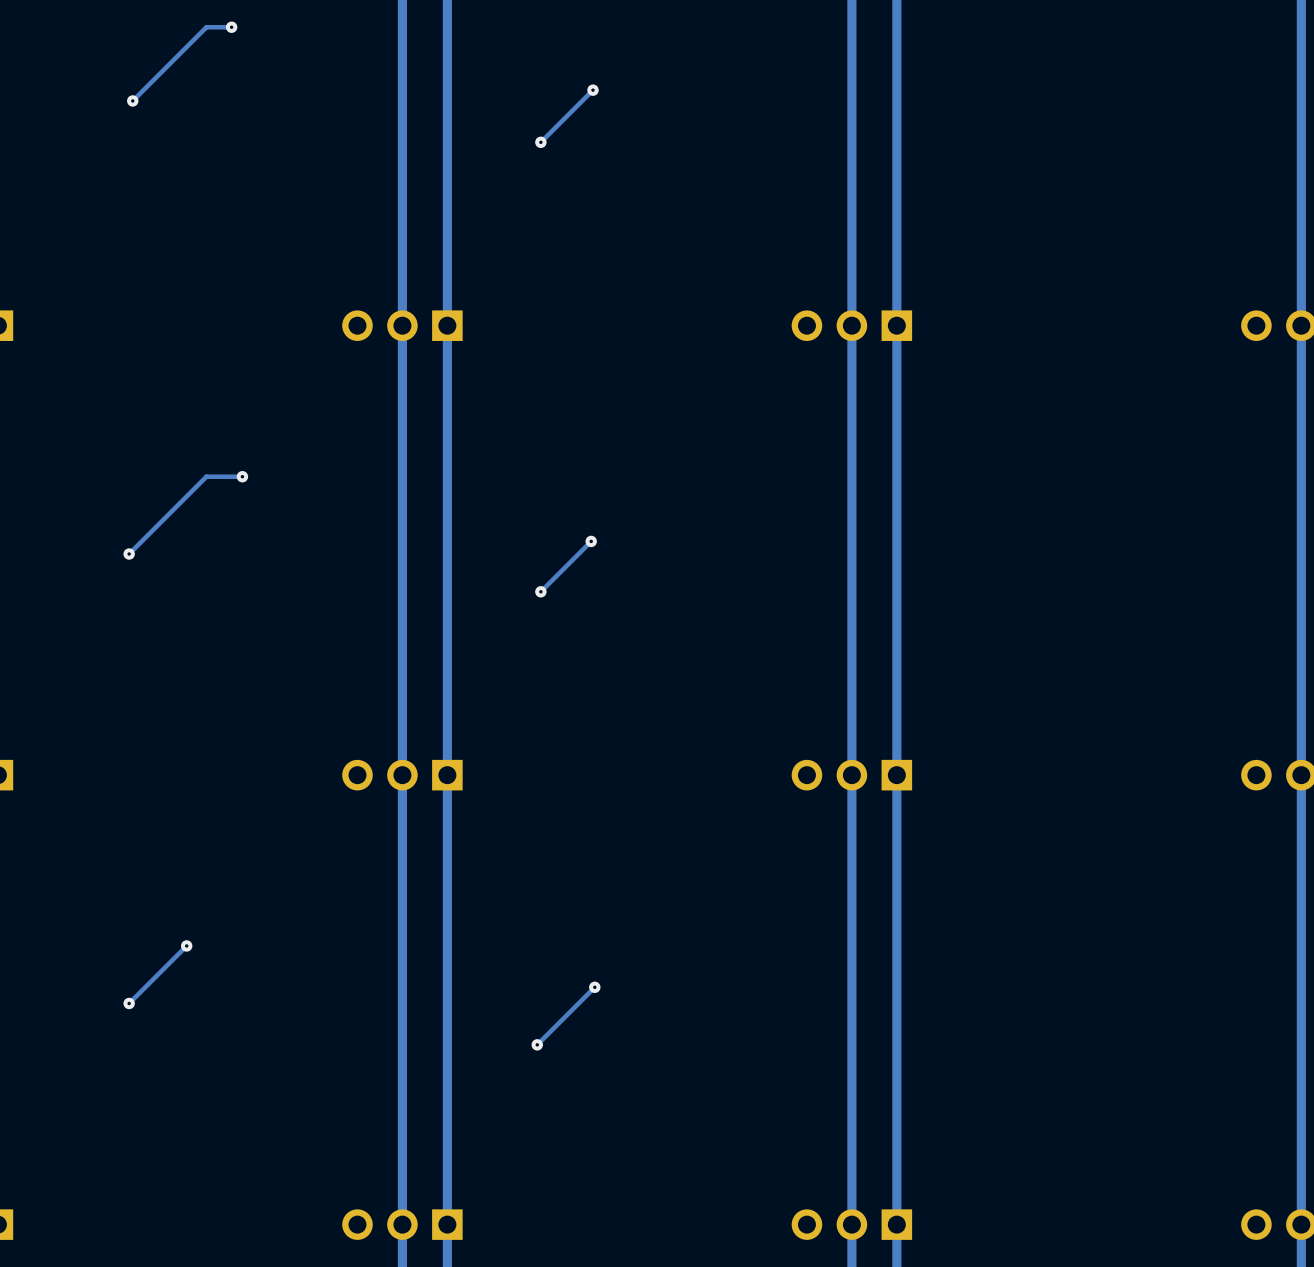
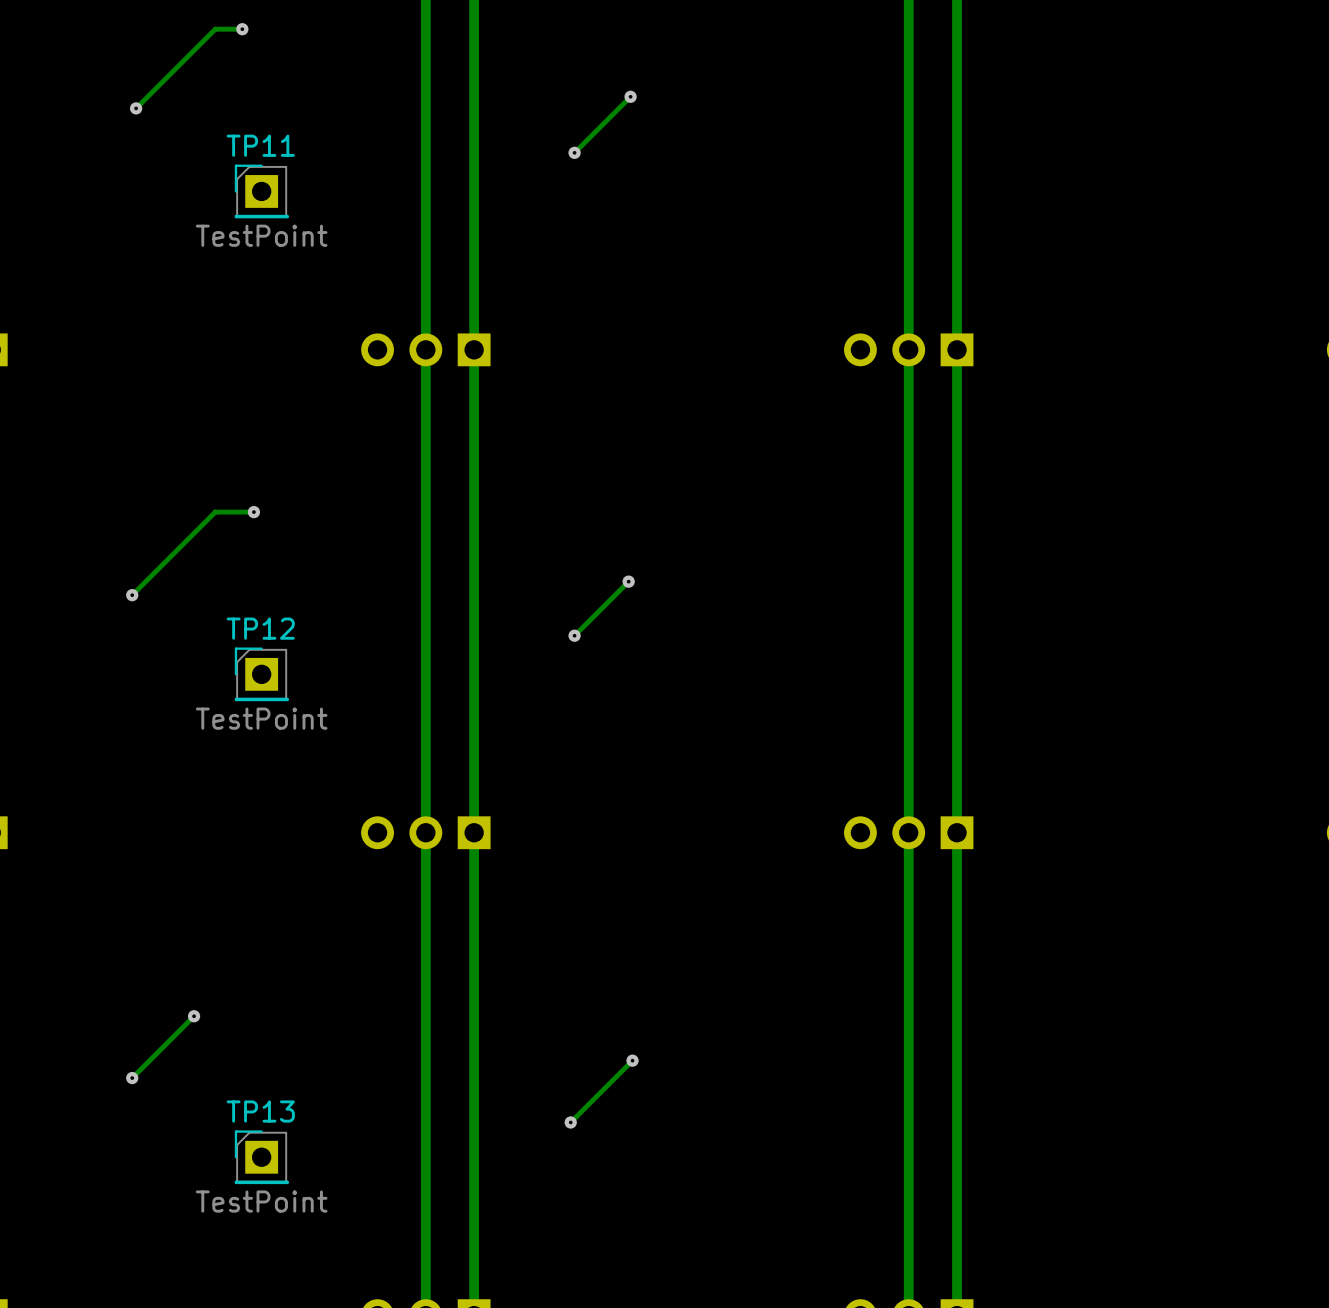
TP11: none -> TestPoint (261, 191)
TP12: none -> TestPoint (261, 674)
TP13: none -> TestPoint (261, 1157)

